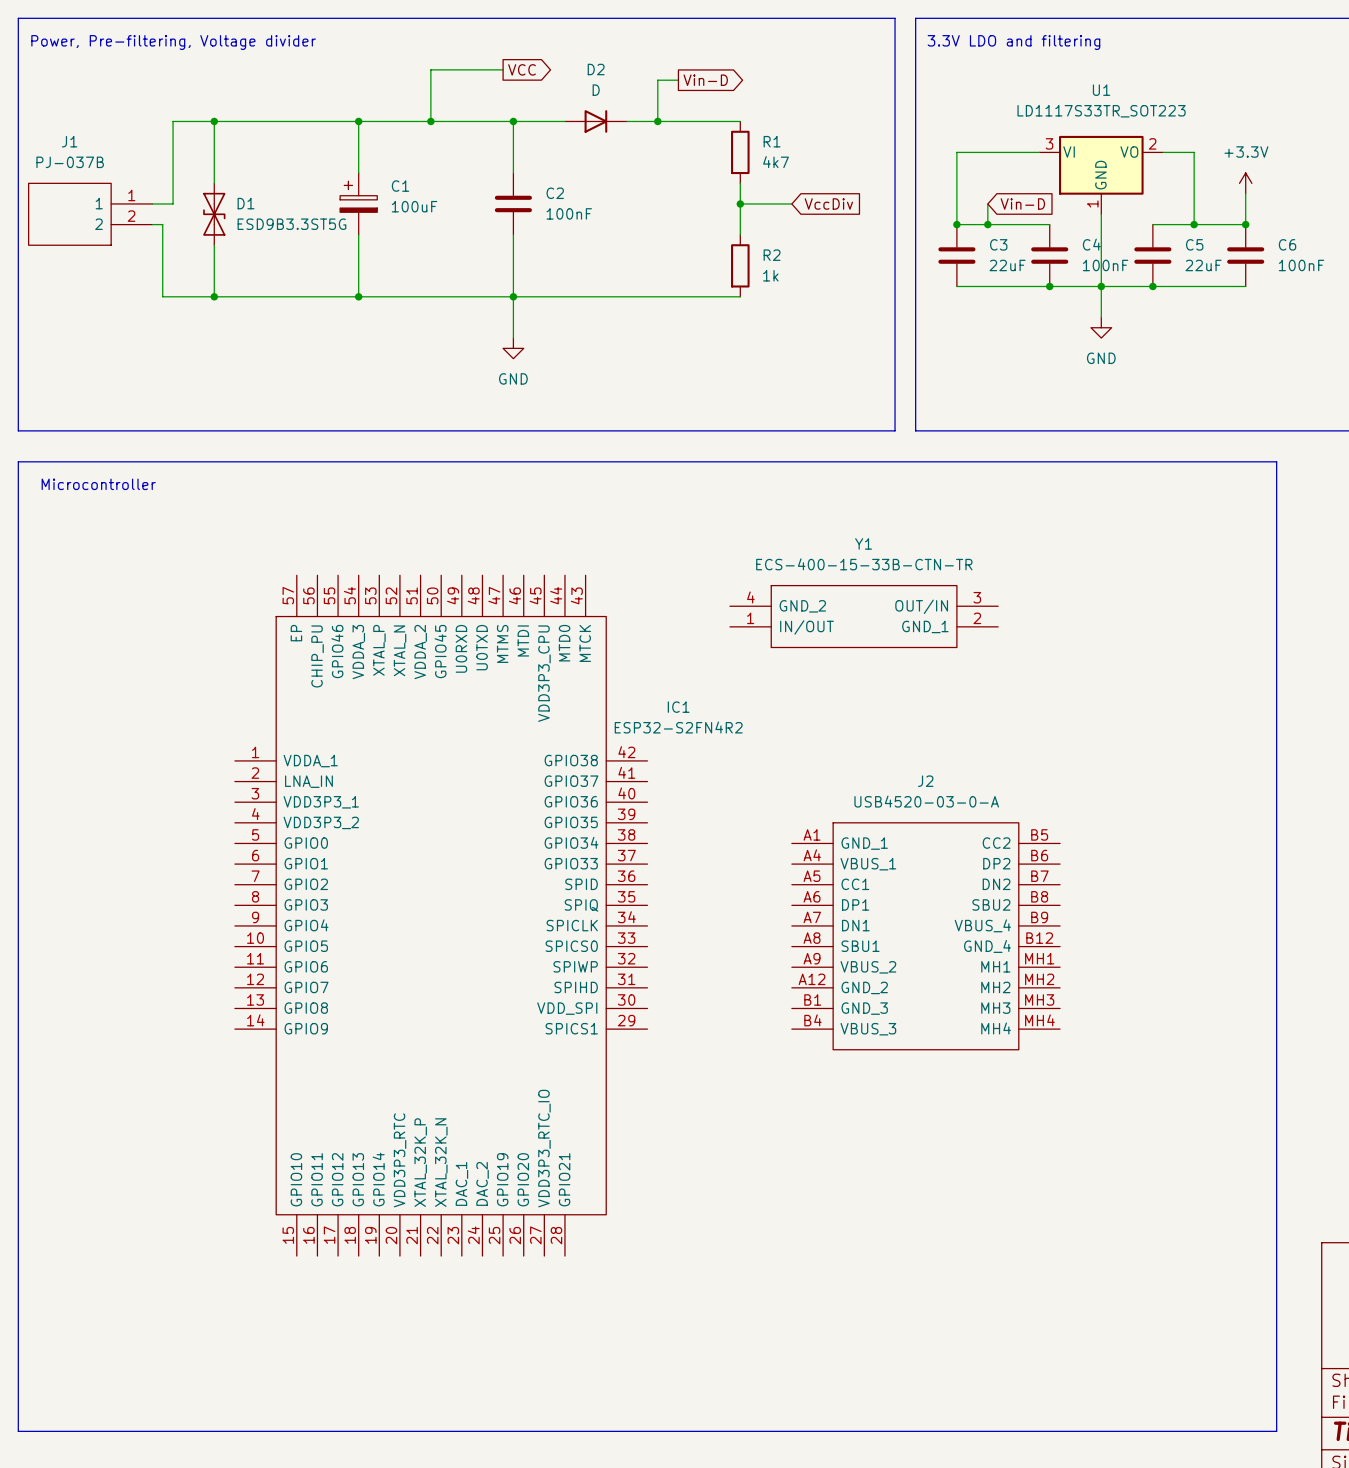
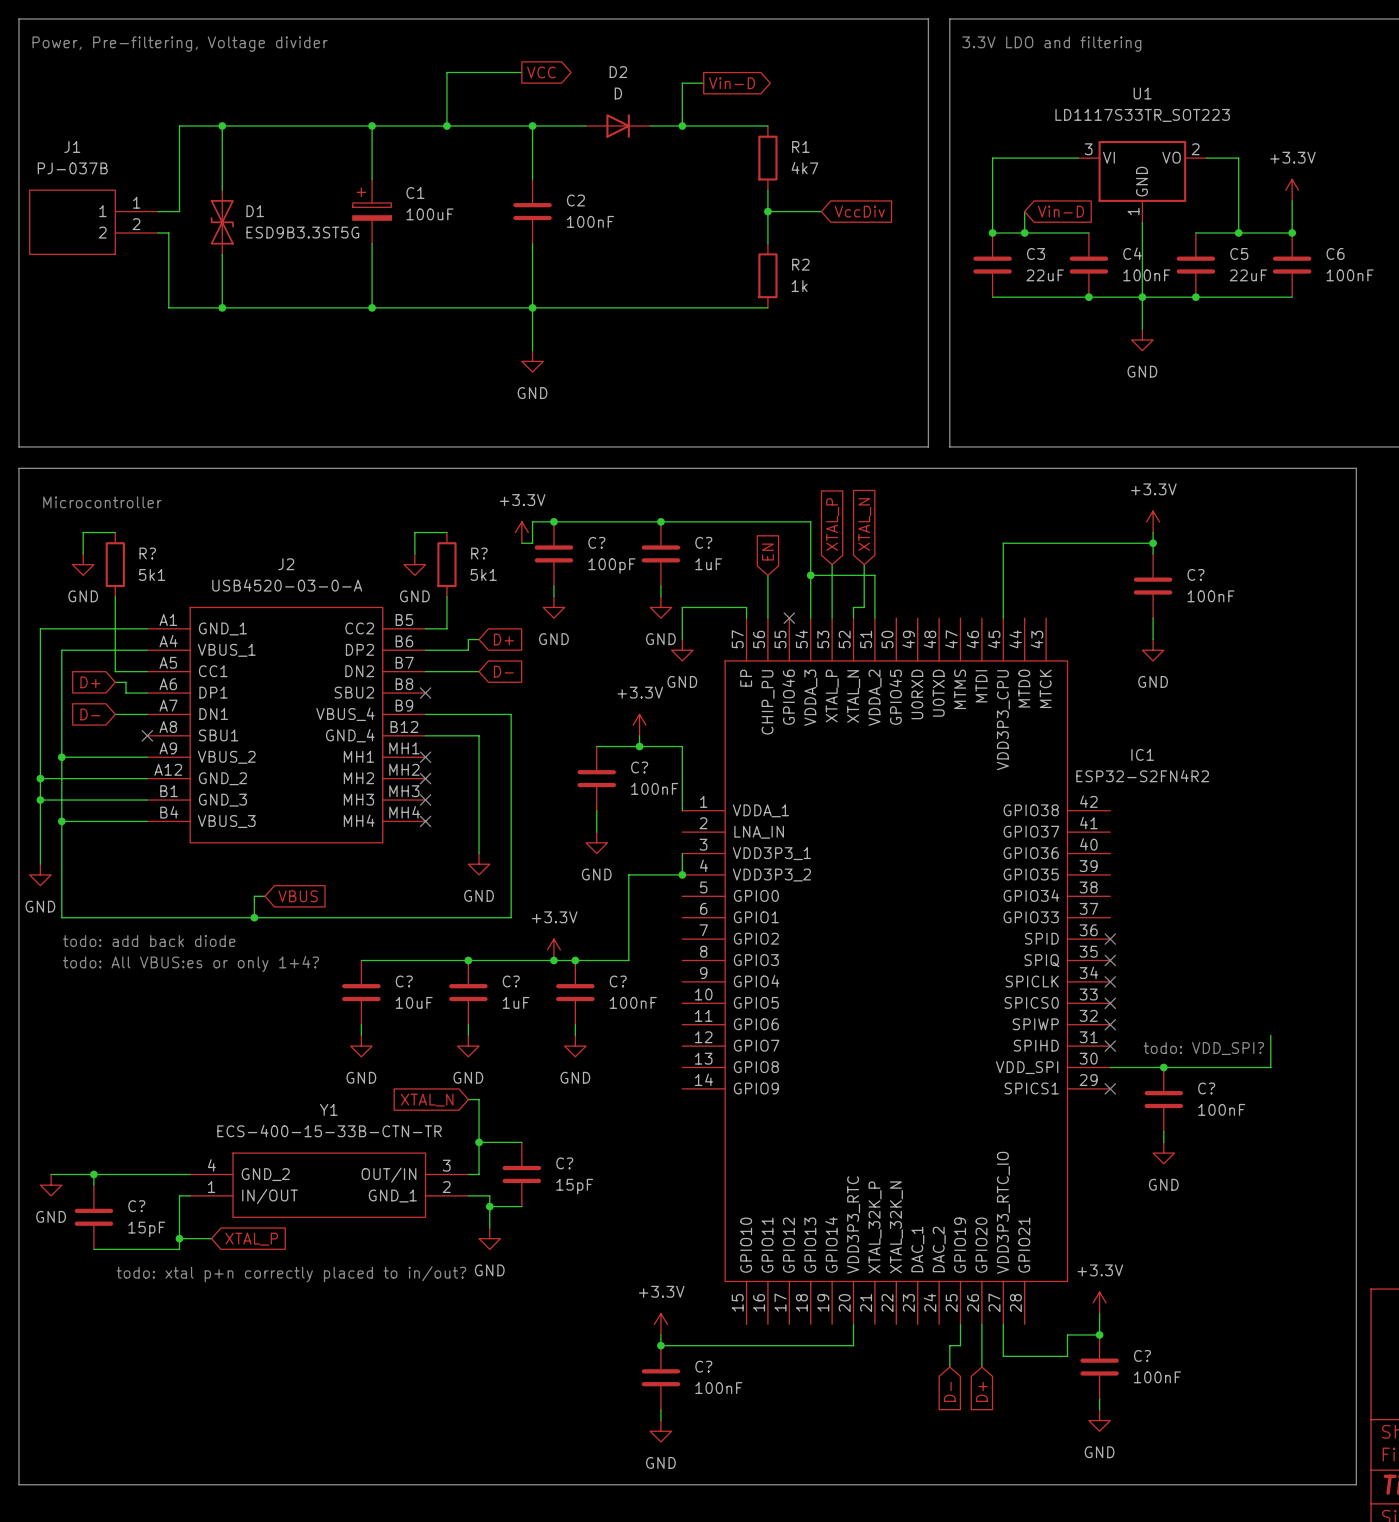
line: (18, 461) (1276, 461) (1276, 1431) -> (19, 479) (19, 468) (1356, 468) (1356, 1484) (1324, 1484)
junction: none -> (553, 521)
junction: none -> (660, 521)
power symbol: none -> +3.3V (1153, 521)
global label: none -> XTAL_P (832, 524)
global label: none -> XTAL_N (864, 524)
wire: none -> (115, 532) (83, 532) (83, 553)
wire: none -> (446, 532) (414, 532) (414, 553)
power symbol: none -> +3.3V (521, 532)
wire: none -> (1153, 532) (1153, 553)
wire: none -> (521, 543) (532, 543) (532, 521) (810, 521) (810, 618)
wire: none -> (1153, 543) (1003, 543) (1003, 618)
junction: none -> (1153, 543)
global label: none -> EN (767, 552)
C?: none -> 100pF (553, 553)
C?: none -> 1uF (660, 553)
power symbol: none -> GND (83, 564)
R?: none -> 5k1 (115, 564)
power symbol: none -> GND (414, 564)
R?: none -> 5k1 (446, 564)
wire: none -> (832, 564) (832, 618)
wire: none -> (864, 564) (864, 607) (853, 607) (853, 618)
wire: none -> (767, 575) (767, 618)
wire: none -> (810, 575) (874, 575) (874, 618)
junction: none -> (810, 575)
wire: none -> (553, 586) (553, 596)
wire: none -> (660, 586) (660, 596)
C?: none -> 100nF (1153, 586)
wire: none -> (115, 596) (115, 671) (147, 671)
wire: none -> (446, 596) (446, 628) (425, 628)
power symbol: none -> GND (553, 607)
power symbol: none -> GND (660, 607)
wire: none -> (746, 618) (746, 607) (682, 607) (682, 639)
no-connect mark: none -> (789, 618)
wire: none -> (1153, 618) (1153, 639)
wire: none -> (147, 628) (40, 628) (40, 864)
wire: none -> (479, 639) (468, 639) (468, 650) (425, 650)
global label: none -> D+ (503, 639)
Y1 position: (864, 616) -> (329, 1185)
wire: none -> (147, 650) (61, 650) (61, 917) (511, 917) (511, 714) (425, 714)
power symbol: none -> GND (682, 650)
power symbol: none -> GND (1153, 650)
wire: none -> (425, 671) (479, 671)
global label: none -> D- (503, 671)
global label: none -> D+ (90, 682)
wire: none -> (115, 682) (125, 682) (125, 693) (147, 693)
no-connect mark: none -> (425, 693)
global label: none -> D- (90, 714)
wire: none -> (115, 714) (147, 714)
power symbol: none -> +3.3V (639, 725)
no-connect mark: none -> (147, 735)
wire: none -> (425, 735) (479, 735) (479, 853)
wire: none -> (639, 735) (639, 746)
wire: none -> (596, 746) (682, 746) (682, 810)
junction: none -> (639, 746)
wire: none -> (61, 757) (147, 757)
junction: none -> (61, 757)
no-connect mark: none -> (425, 757)
wire: none -> (40, 778) (147, 778)
junction: none -> (40, 778)
no-connect mark: none -> (425, 778)
C?: none -> 100nF (596, 778)
wire: none -> (40, 800) (147, 800)
junction: none -> (40, 800)
no-connect mark: none -> (425, 800)
wire: none -> (596, 810) (596, 832)
wire: none -> (61, 821) (147, 821)
junction: none -> (61, 821)
no-connect mark: none -> (425, 821)
power symbol: none -> GND (596, 842)
wire: none -> (682, 853) (682, 874) (628, 874) (628, 960) (361, 960)
power symbol: none -> GND (479, 864)
power symbol: none -> GND (40, 874)
junction: none -> (682, 874)
wire: none -> (265, 896) (254, 896) (254, 917)
global label: none -> VBUS (298, 896)
junction: none -> (254, 917)
no-connect mark: none -> (1110, 939)
text: none -> todo: add back diode (149, 941)
IC1 position: (441, 915) -> (896, 971)
power symbol: none -> +3.3V (553, 949)
junction: none -> (468, 960)
junction: none -> (553, 960)
junction: none -> (575, 960)
no-connect mark: none -> (1110, 960)
text: none -> todo: All VBUS:es or only 1+4? (191, 963)
J2 position: (925, 936) -> (286, 725)
no-connect mark: none -> (1110, 981)
C?: none -> 10uF (361, 992)
C?: none -> 1uF (468, 992)
C?: none -> 100nF (575, 992)
no-connect mark: none -> (1110, 1003)
wire: none -> (361, 1024) (361, 1035)
wire: none -> (468, 1024) (468, 1035)
wire: none -> (575, 1024) (575, 1035)
no-connect mark: none -> (1110, 1024)
wire: none -> (1270, 1035) (1270, 1067) (1110, 1067)
power symbol: none -> GND (361, 1046)
power symbol: none -> GND (468, 1046)
power symbol: none -> GND (575, 1046)
no-connect mark: none -> (1110, 1046)
text: none -> todo: VDD_SPI? (1203, 1048)
junction: none -> (1163, 1067)
no-connect mark: none -> (1110, 1088)
global label: none -> XTAL_N (427, 1100)
wire: none -> (468, 1099) (479, 1099) (479, 1174) (468, 1174)
C?: none -> 100nF (1163, 1099)
wire: none -> (1163, 1131) (1163, 1142)
wire: none -> (479, 1142) (521, 1142)
junction: none -> (479, 1142)
power symbol: none -> GND (1163, 1153)
wire: none -> (51, 1174) (190, 1174)
wire: none -> (93, 1174) (93, 1185)
junction: none -> (93, 1174)
C?: none -> 15pF (521, 1174)
power symbol: none -> GND (51, 1185)
wire: none -> (190, 1195) (179, 1195) (179, 1249) (93, 1249)
wire: none -> (468, 1195) (489, 1195) (489, 1227)
wire: none -> (489, 1206) (521, 1206)
junction: none -> (489, 1206)
C?: none -> 15pF (93, 1217)
wire: none -> (179, 1238) (211, 1238)
junction: none -> (179, 1238)
global label: none -> XTAL_P (251, 1239)
power symbol: none -> GND (489, 1238)
text: none -> todo: xtal p+n correctly placed to in/out? (291, 1274)
power symbol: none -> +3.3V (1099, 1302)
wire: none -> (1099, 1313) (1099, 1334) (1067, 1334) (1067, 1356) (1003, 1356) (1003, 1324)
power symbol: none -> +3.3V (660, 1324)
wire: none -> (853, 1324) (853, 1345) (660, 1345) (660, 1334)
wire: none -> (960, 1324) (960, 1345) (949, 1345) (949, 1367)
wire: none -> (981, 1324) (981, 1367)
junction: none -> (1099, 1334)
junction: none -> (660, 1345)
C?: none -> 100nF (1099, 1367)
C?: none -> 100nF (660, 1377)
global label: none -> D- (949, 1391)
global label: none -> D+ (981, 1391)
wire: none -> (1099, 1399) (1099, 1409)
wire: none -> (660, 1409) (660, 1420)
power symbol: none -> GND (1099, 1420)
power symbol: none -> GND (660, 1431)

